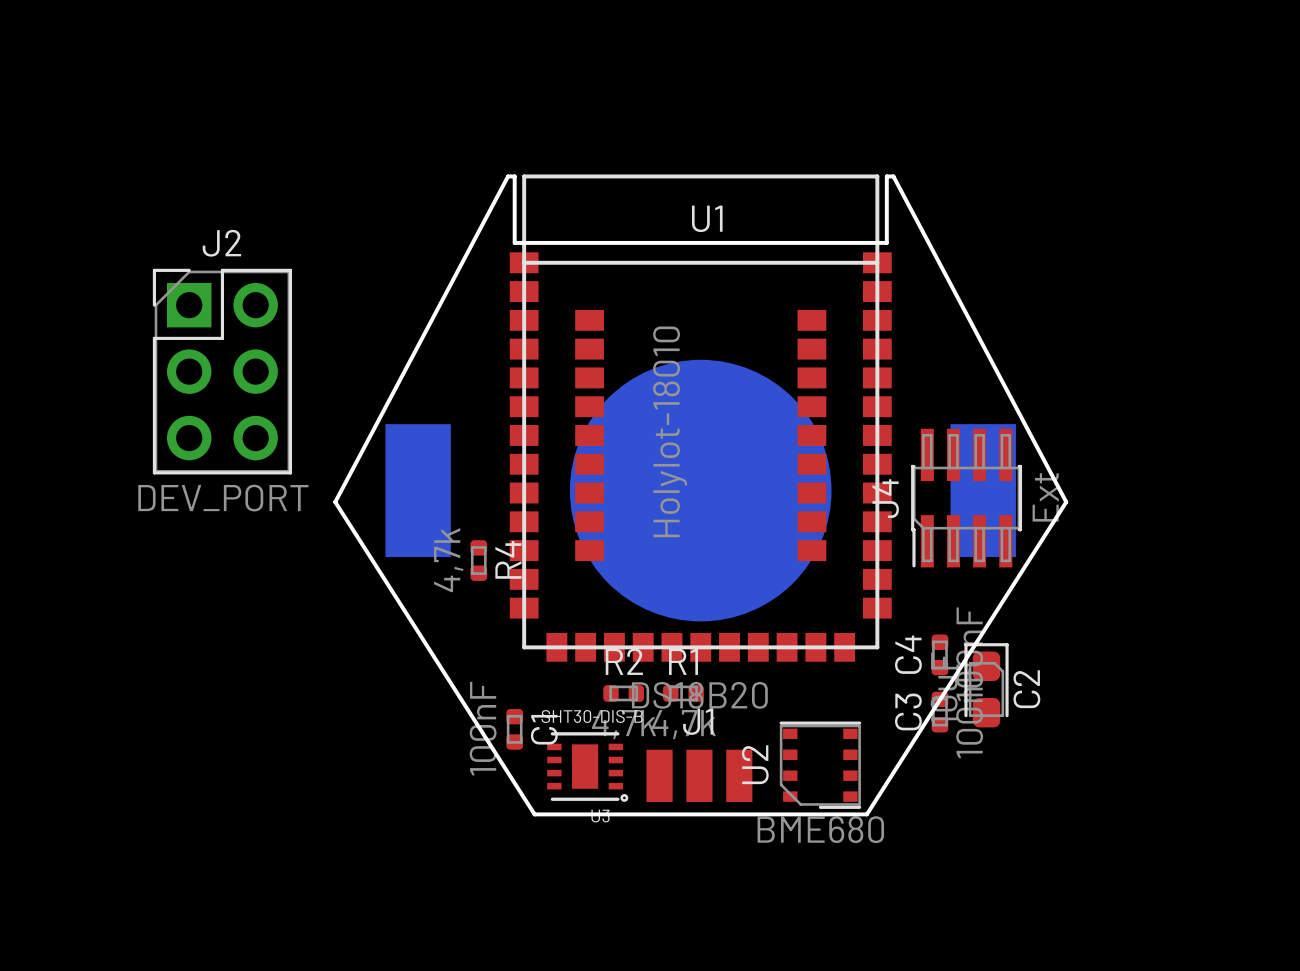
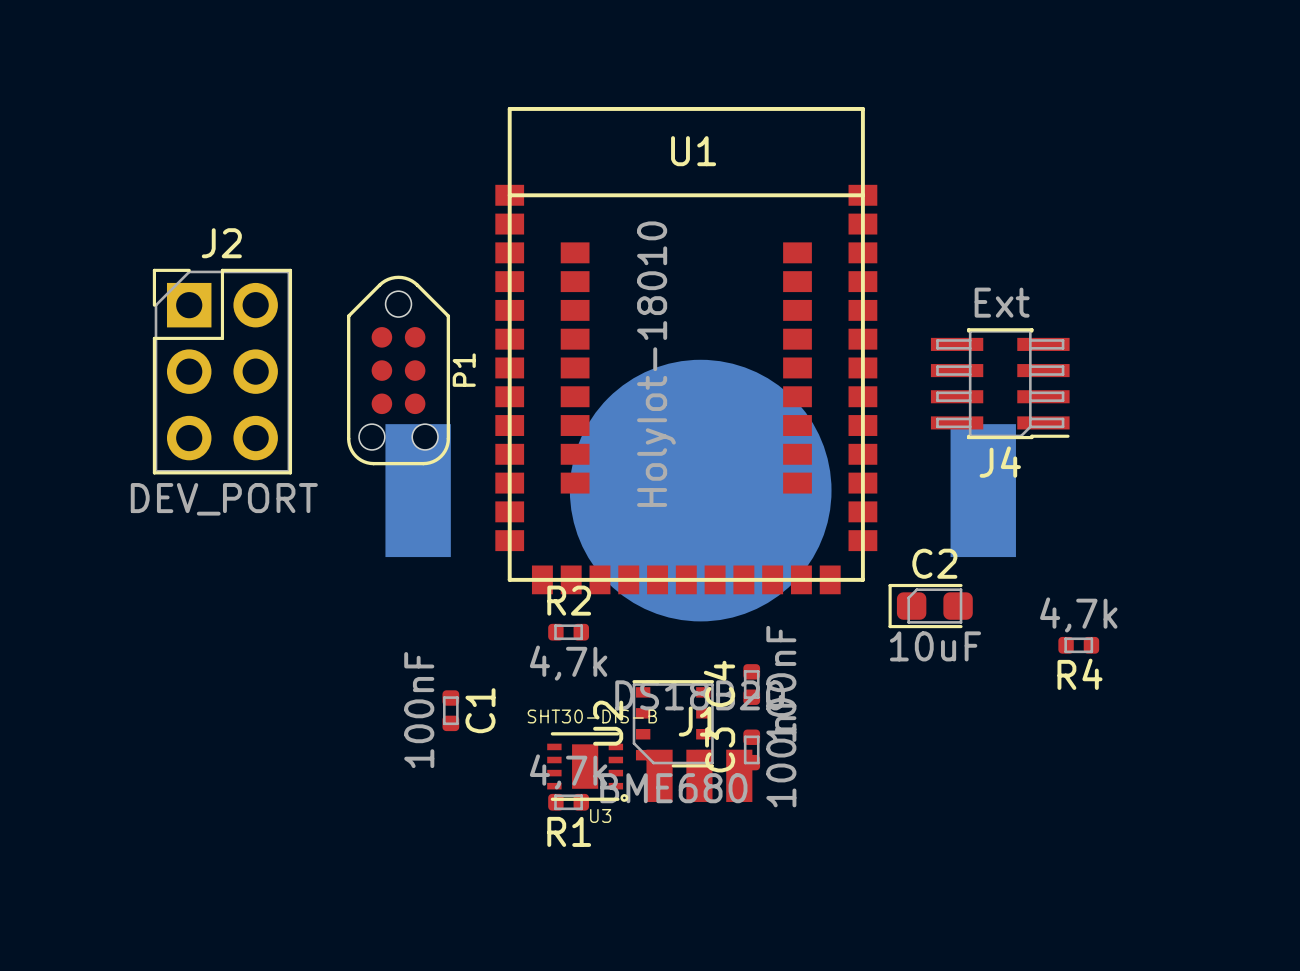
board edge: (508, 176) (514, 176) (514, 242) (886, 242) (886, 176) (893, 176) (1066, 502) (866, 814) (534, 814) (335, 502) (508, 176) -> none
P1: none -> (398, 370)
U1 position: (700, 418) -> (686, 350)
J4 rotation: 0° (966, 498) -> 90° counterclockwise (1000, 383)
J4 position: (966, 498) -> (1000, 383)
R4 rotation: 0° (478, 560) -> 90° clockwise (1078, 645)
R4 position: (478, 560) -> (1078, 645)
C4 position: (939, 654) -> (751, 684)
R1 name position: R1 (683, 661) -> R1 (569, 831)
C2 rotation: 0° (986, 685) -> 90° counterclockwise (930, 606)
C2 position: (986, 685) -> (930, 606)
R2 position: (623, 693) -> (568, 632)
R1 position: (683, 693) -> (568, 802)
C3 position: (939, 712) -> (751, 749)
R1 value position: 4,7k (683, 724) -> 4,7k (568, 771)
C1 position: (514, 729) -> (450, 710)
U2 position: (820, 765) -> (673, 723)

